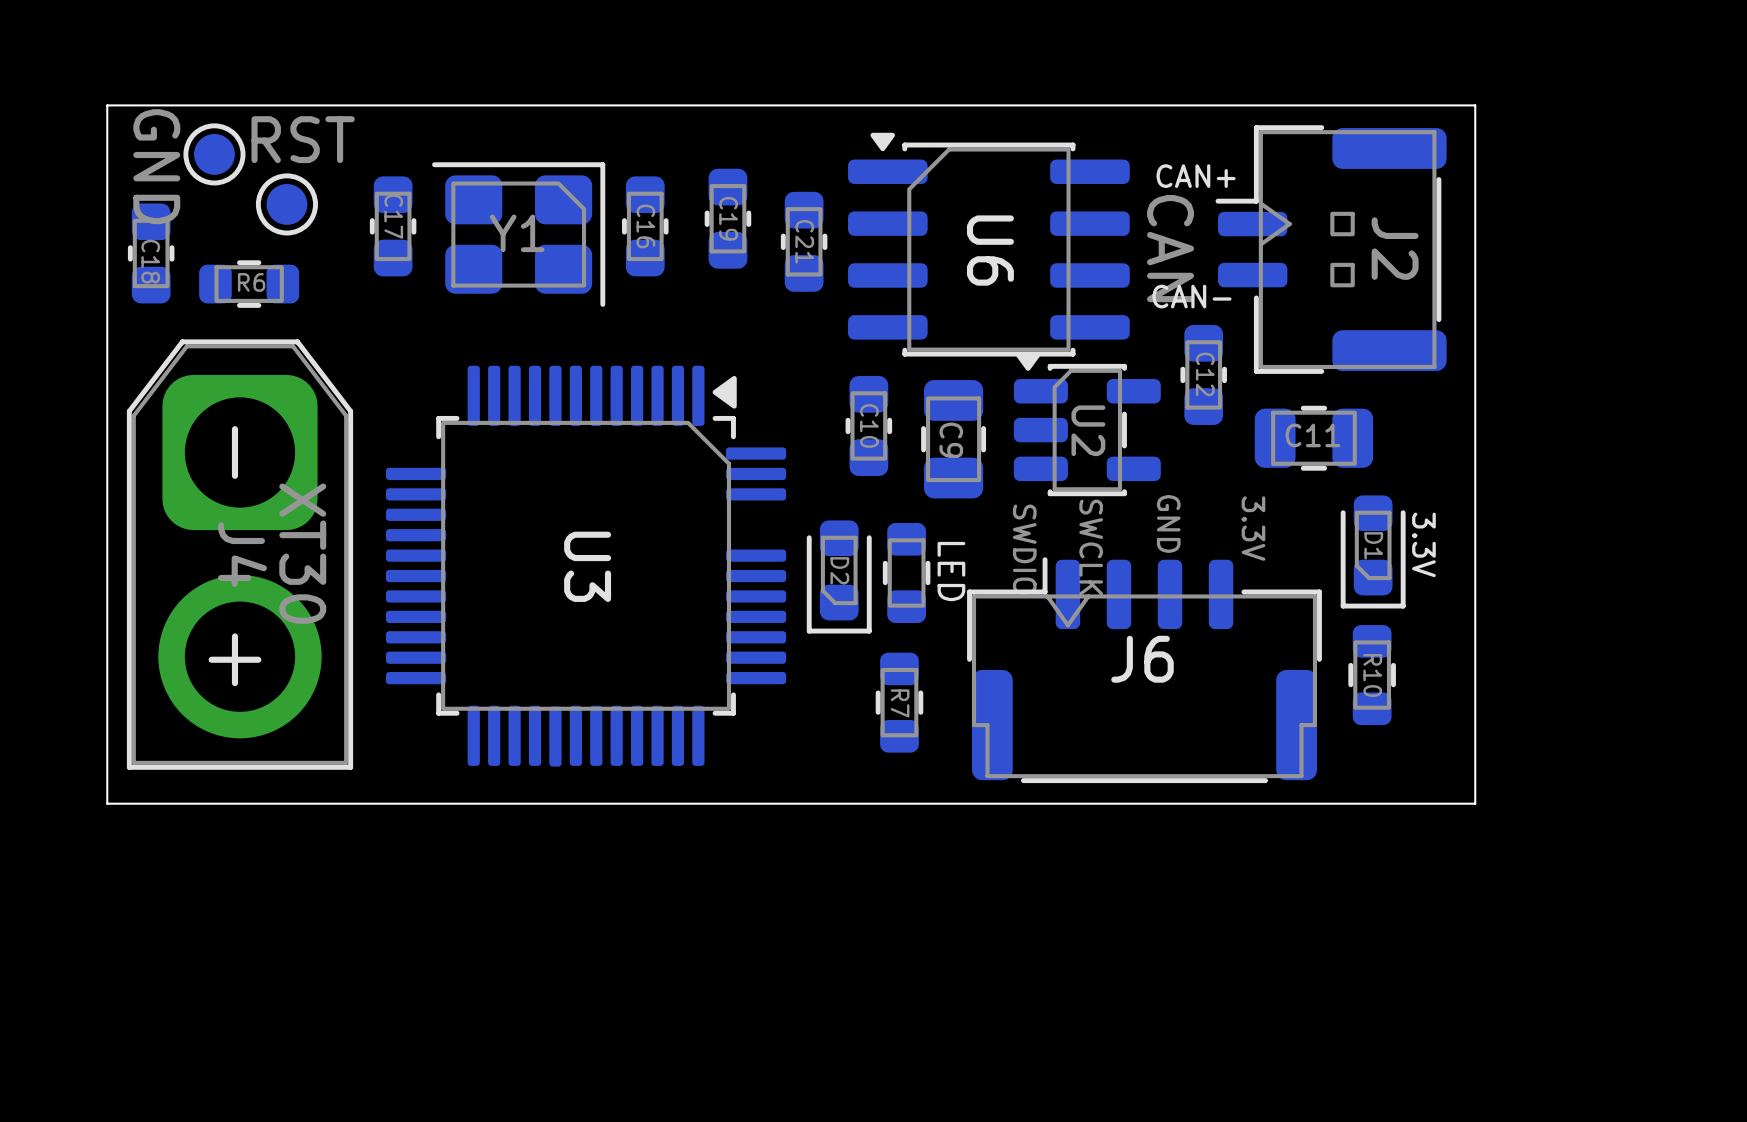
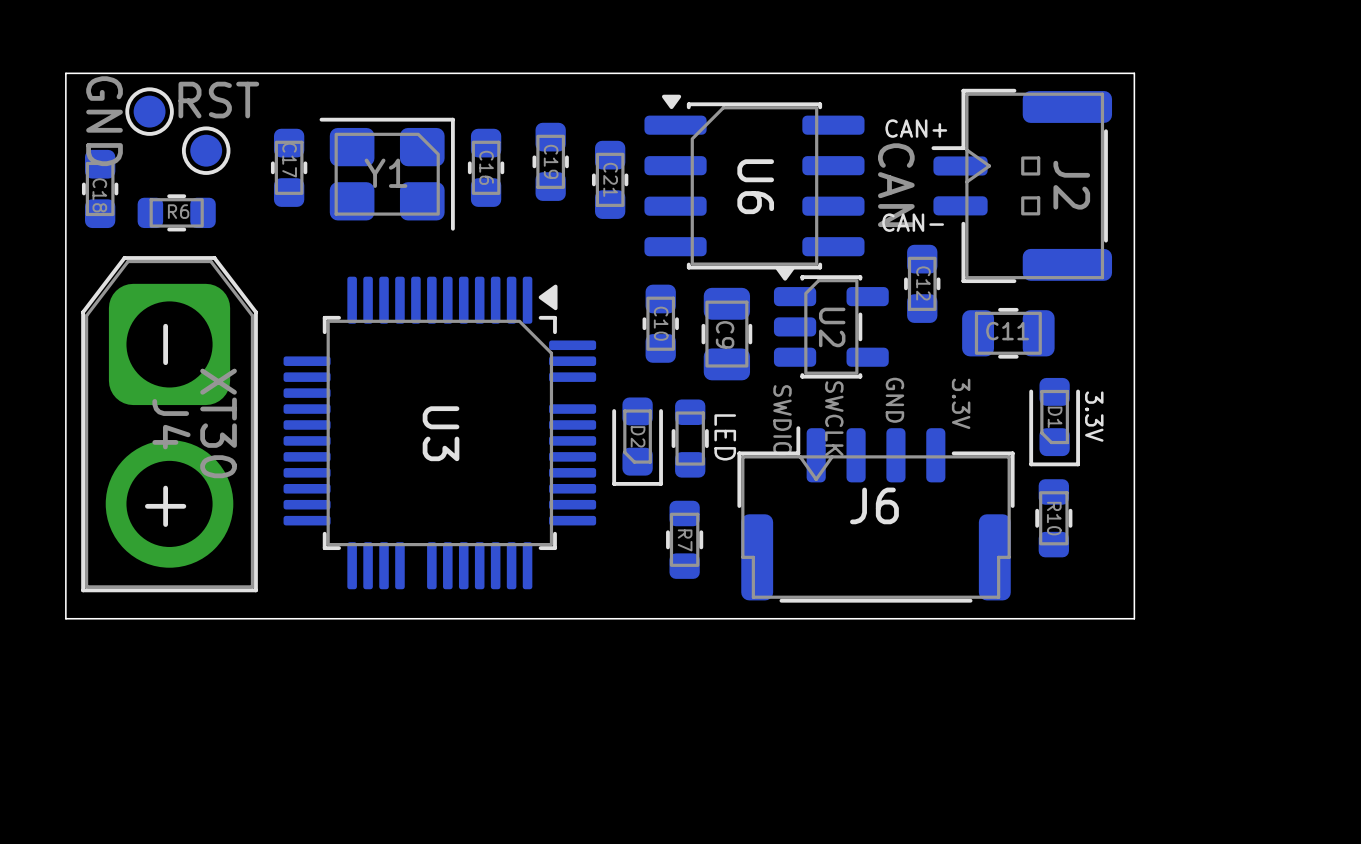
U3 footprint: [385, 365, 787, 767] -> [283, 276, 597, 590]

